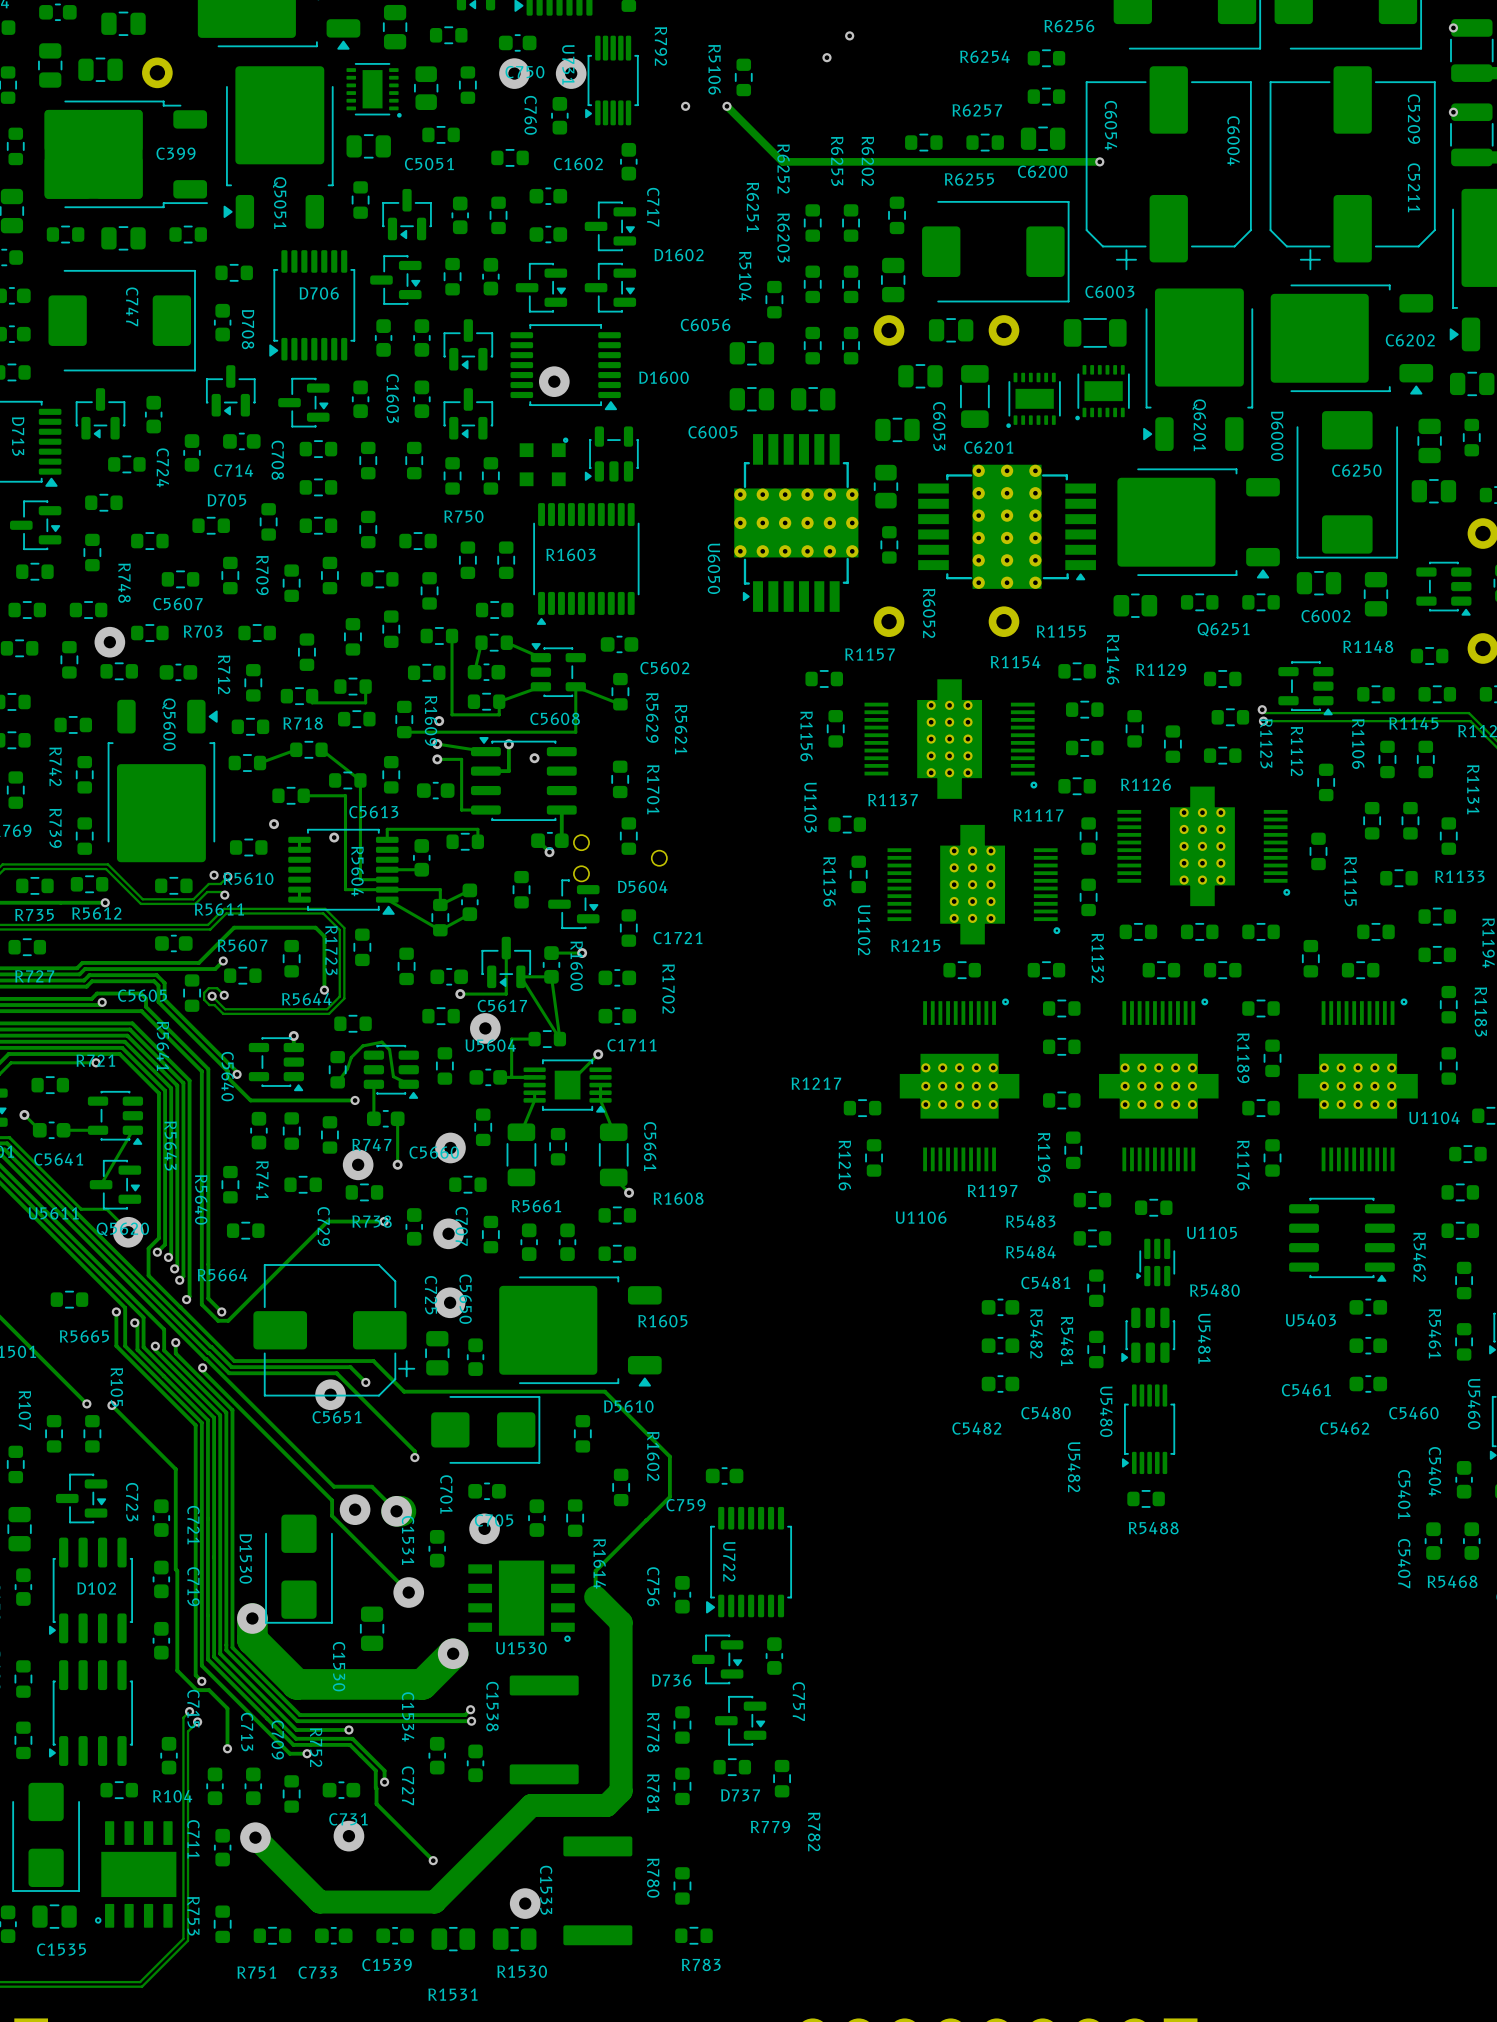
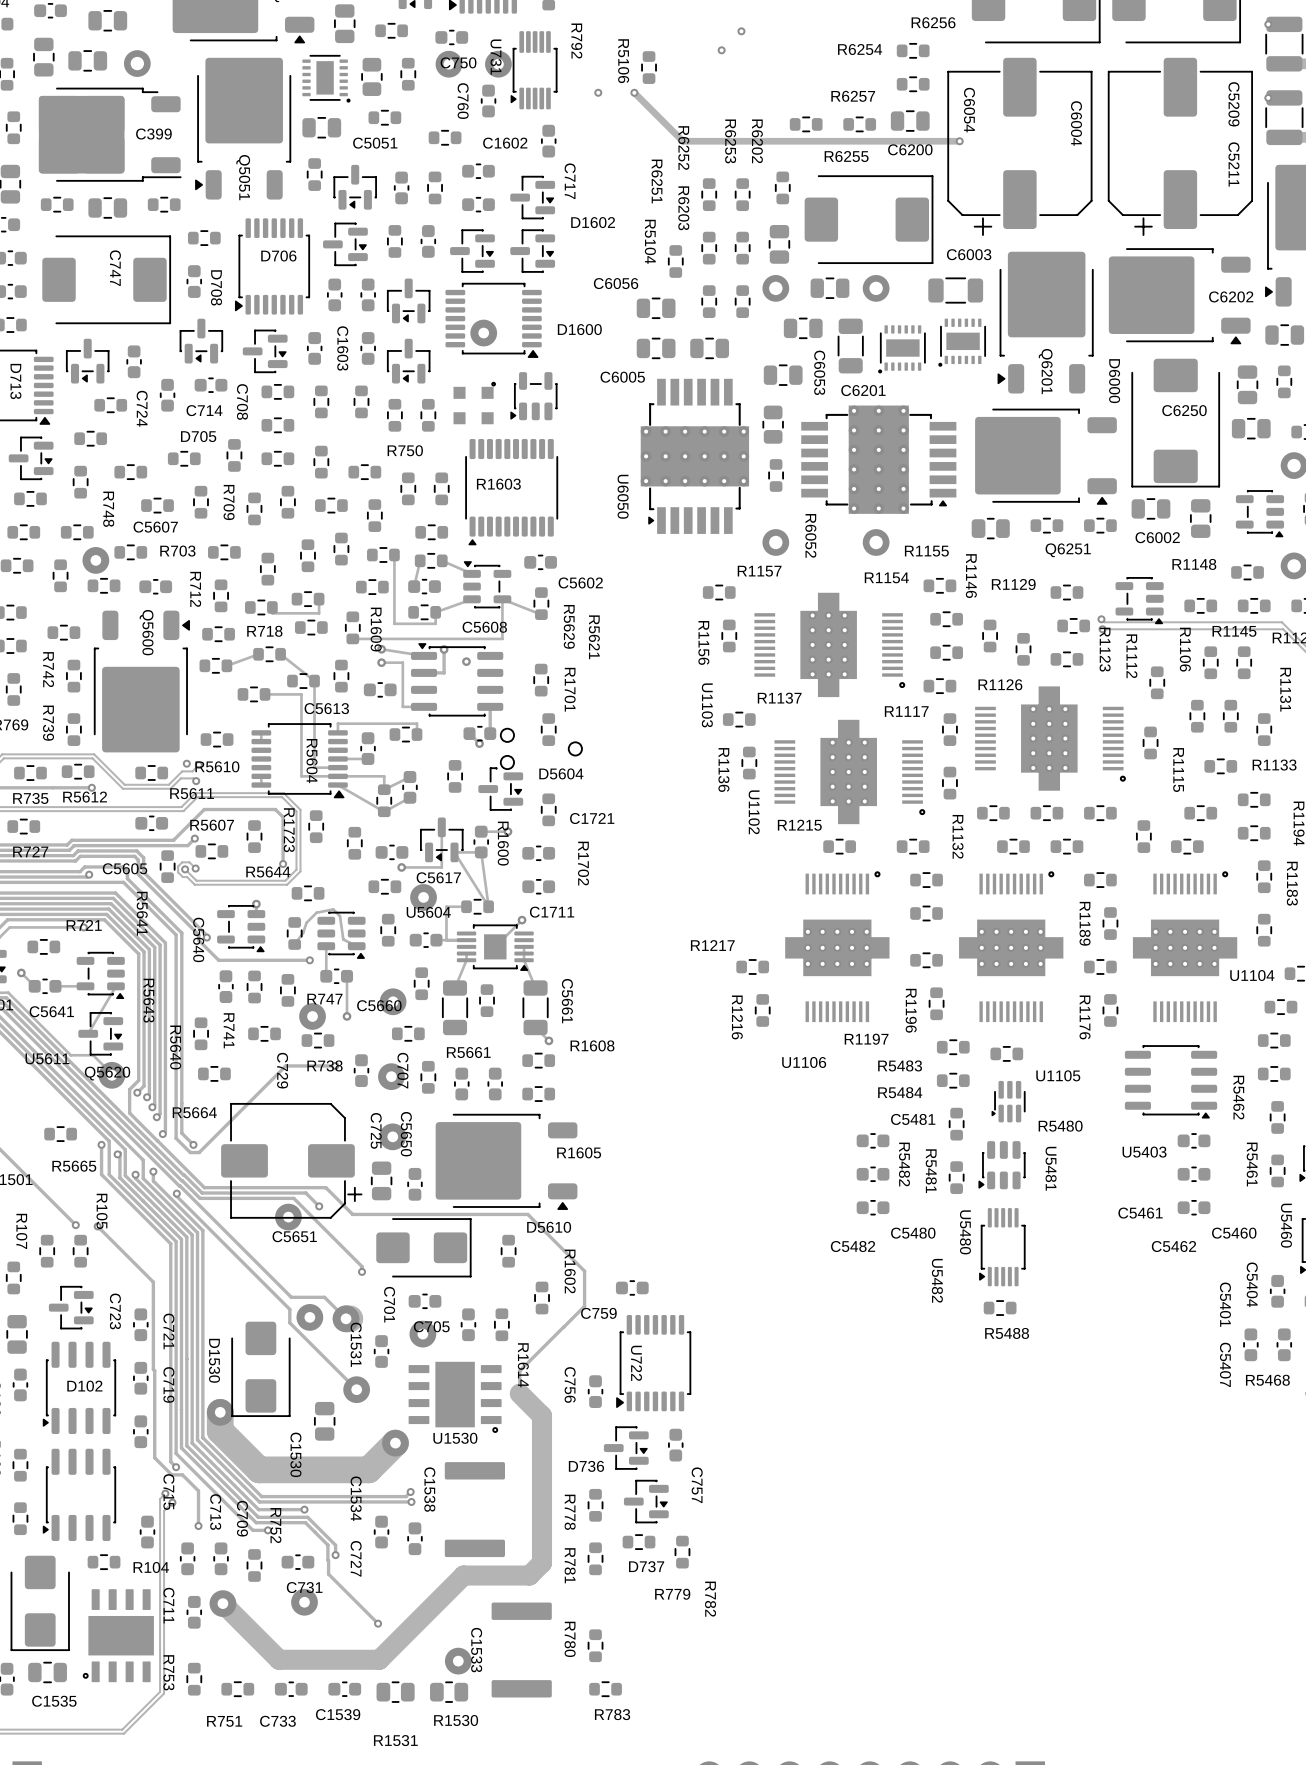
via: (439, 721) -> none
via: (274, 824) -> none
via: (334, 837) -> none

